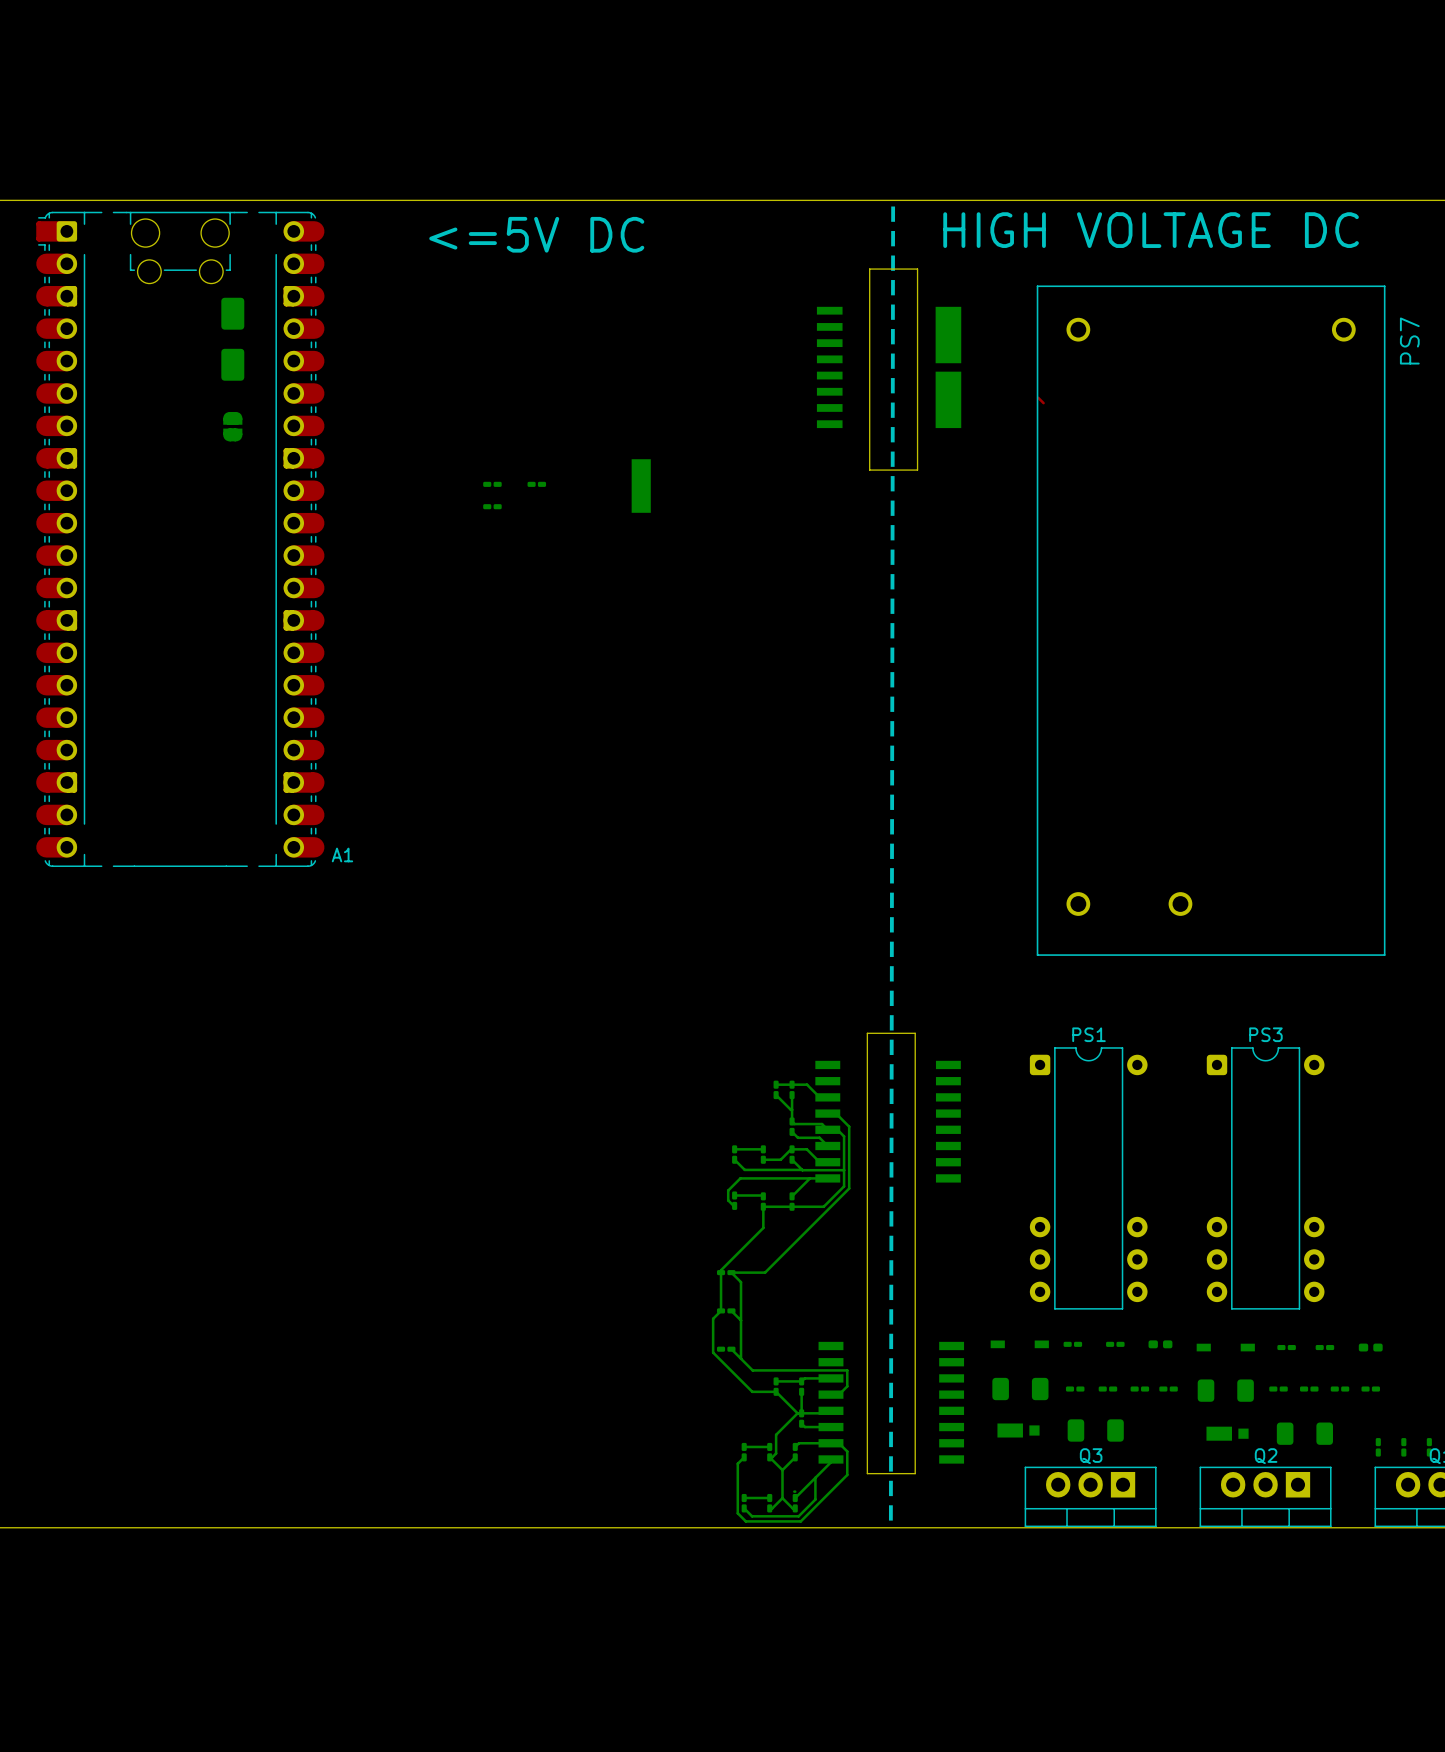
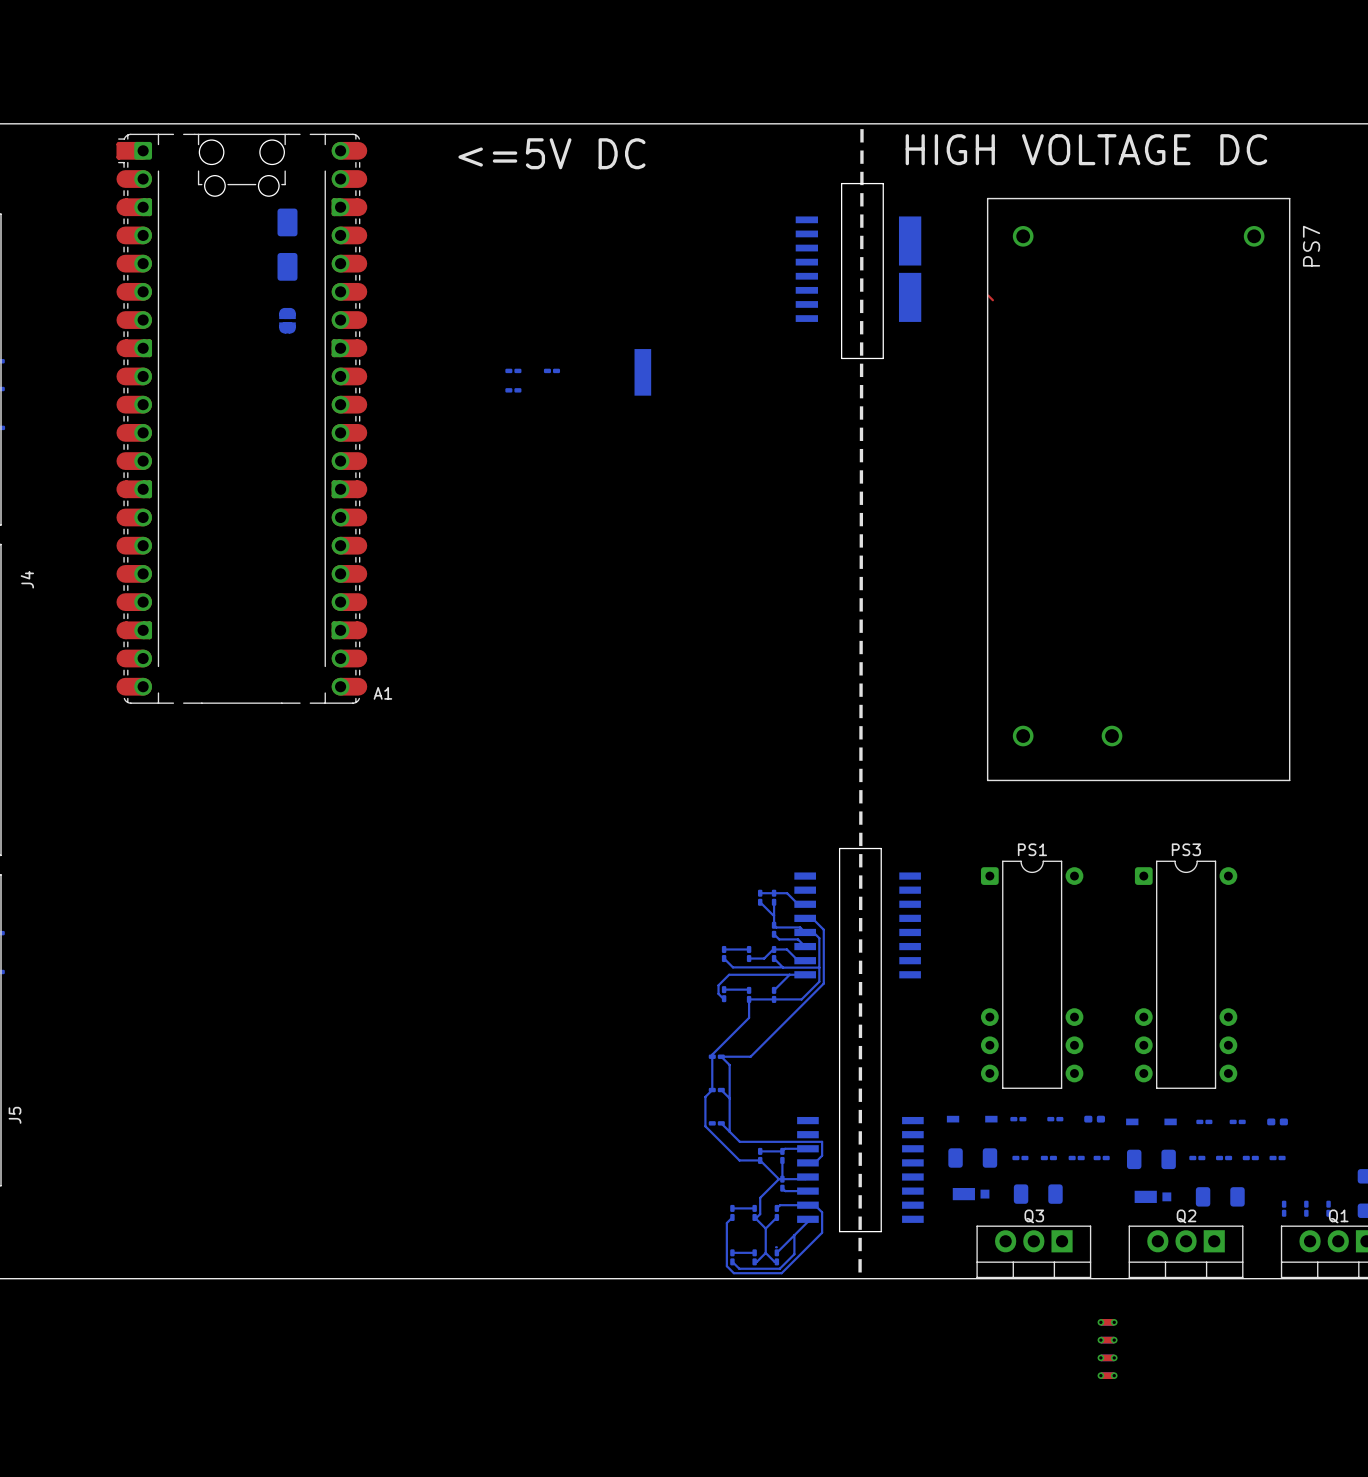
part: none -> (1107, 1322)
part: none -> (1107, 1340)
part: none -> (1107, 1357)
part: none -> (1107, 1375)

